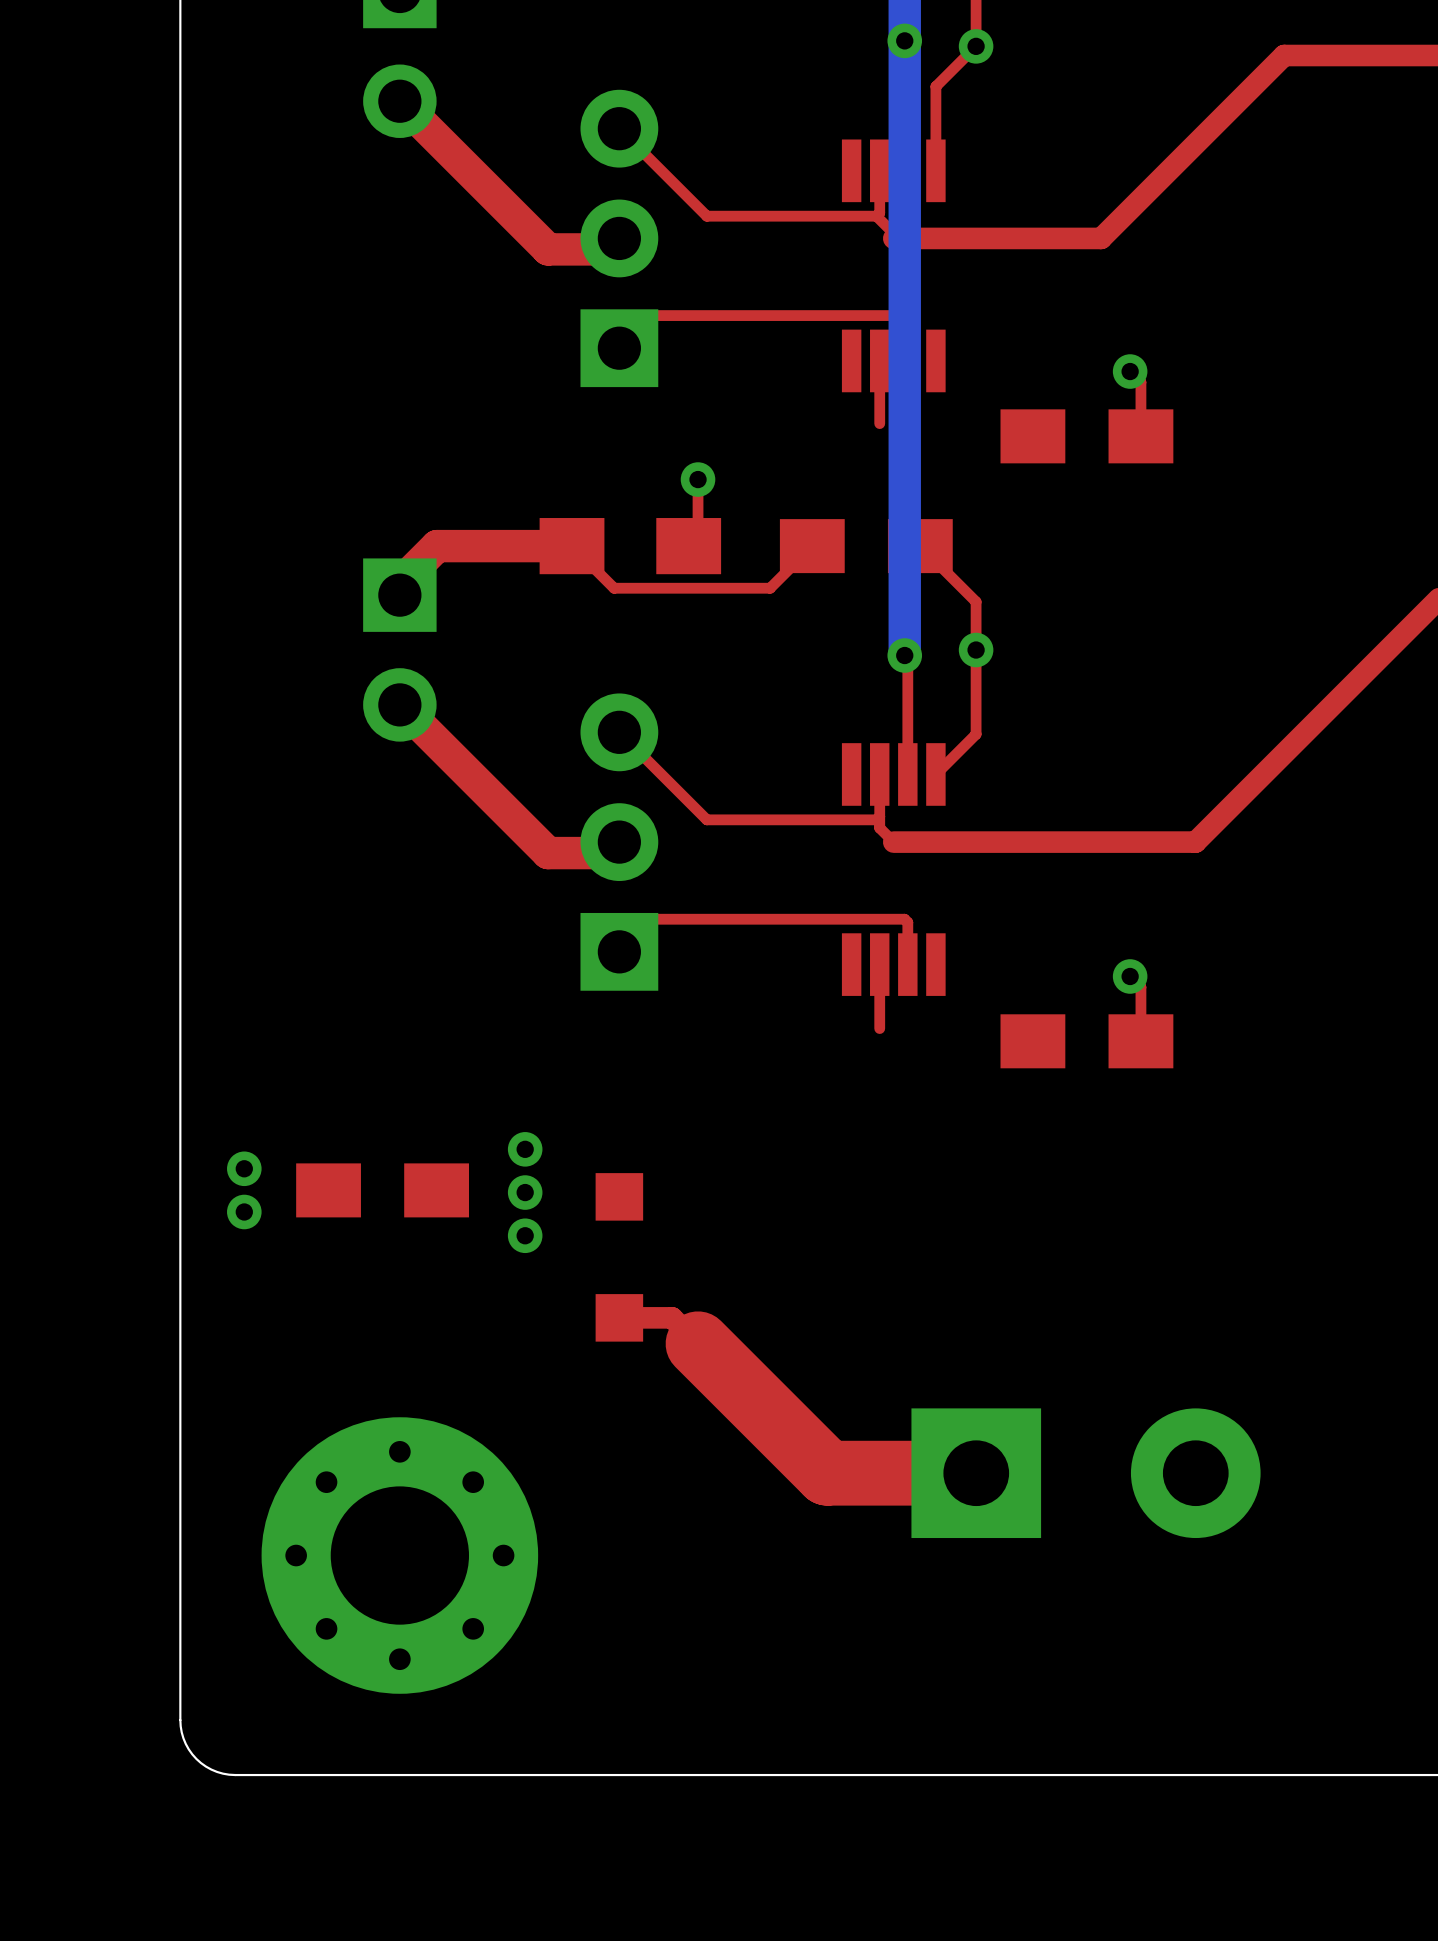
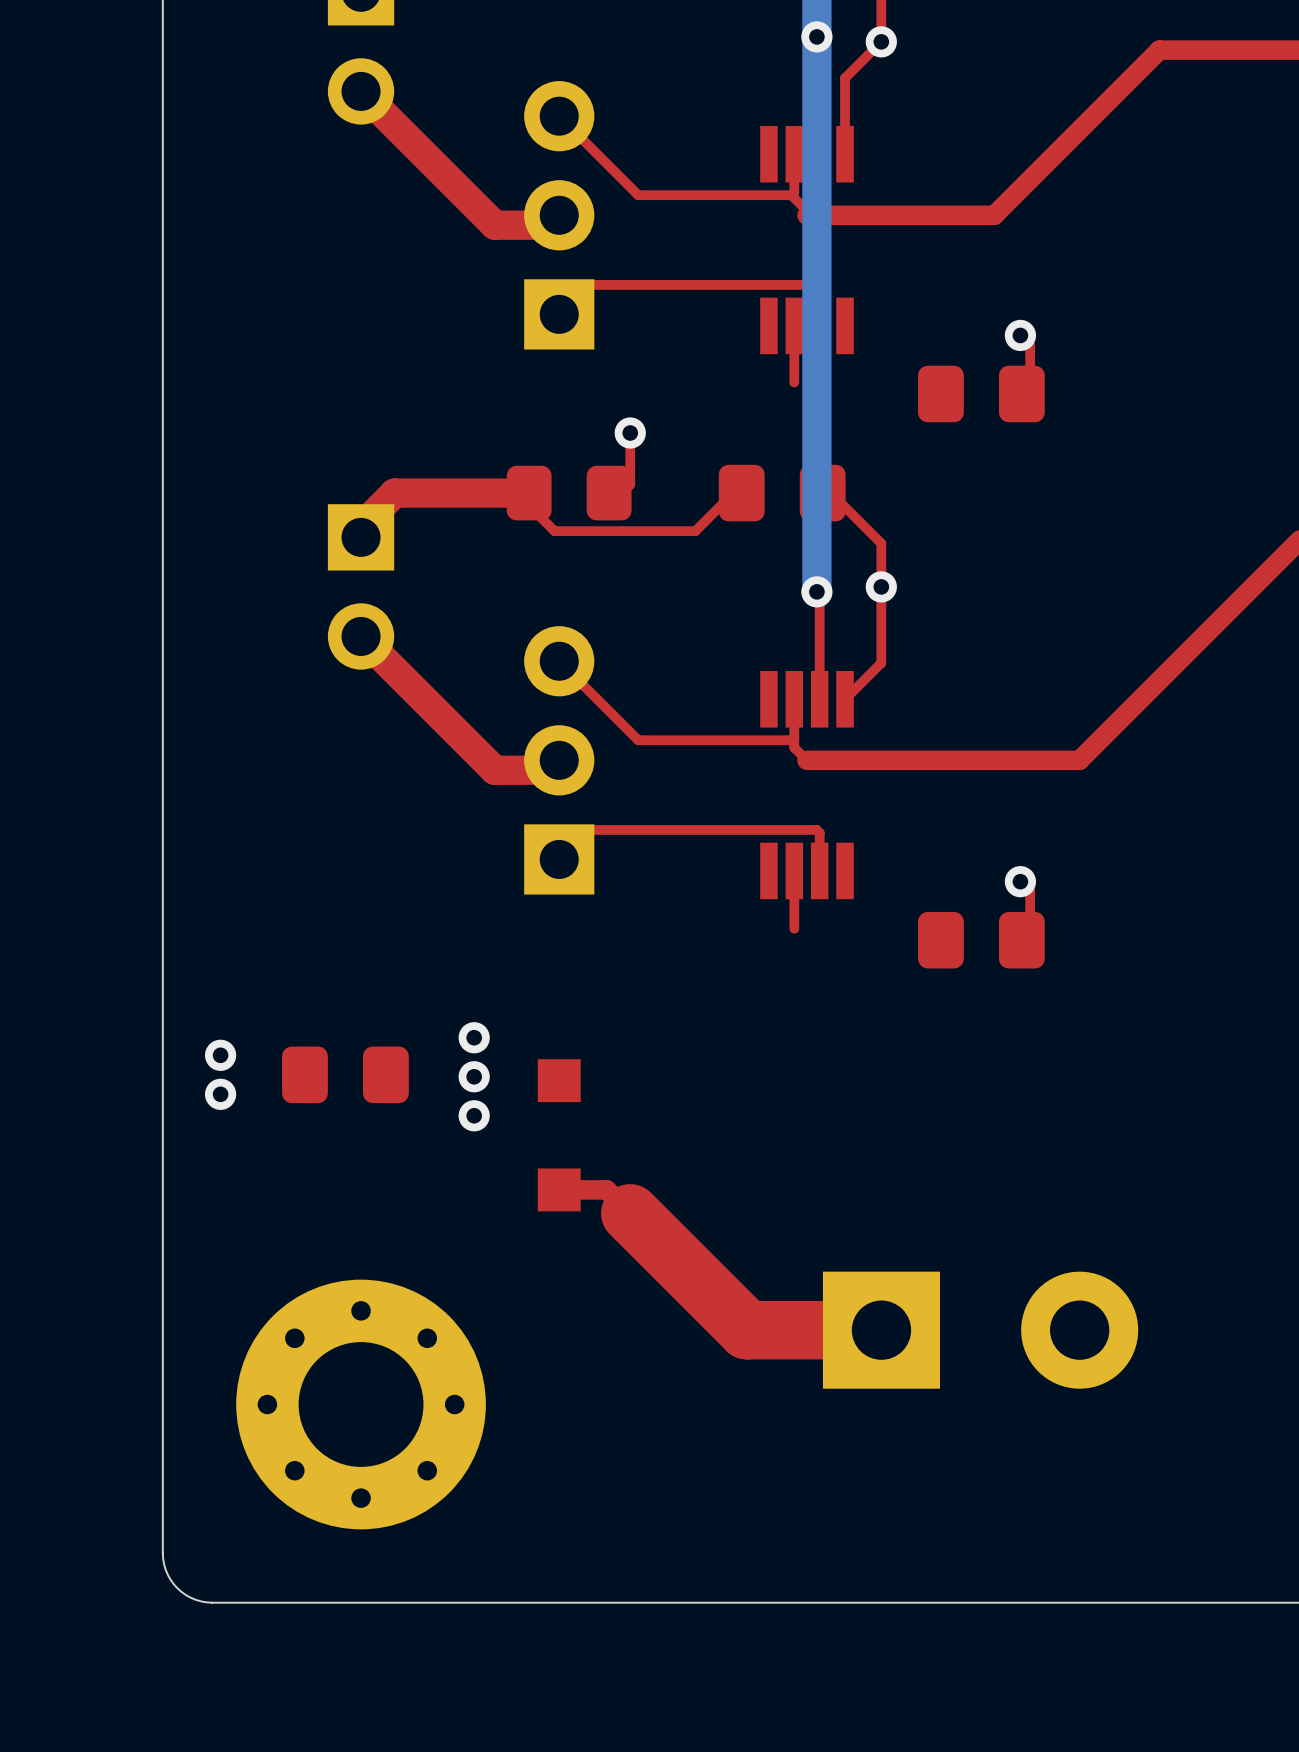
part footprint: [1000, 409, 1174, 464] -> [918, 365, 1045, 423]
part footprint: [539, 518, 722, 575] -> [506, 465, 632, 521]
part footprint: [779, 519, 953, 574] -> [718, 464, 846, 522]
part footprint: [1000, 1014, 1174, 1069] -> [918, 911, 1045, 969]
part footprint: [296, 1163, 470, 1218] -> [282, 1046, 409, 1104]

